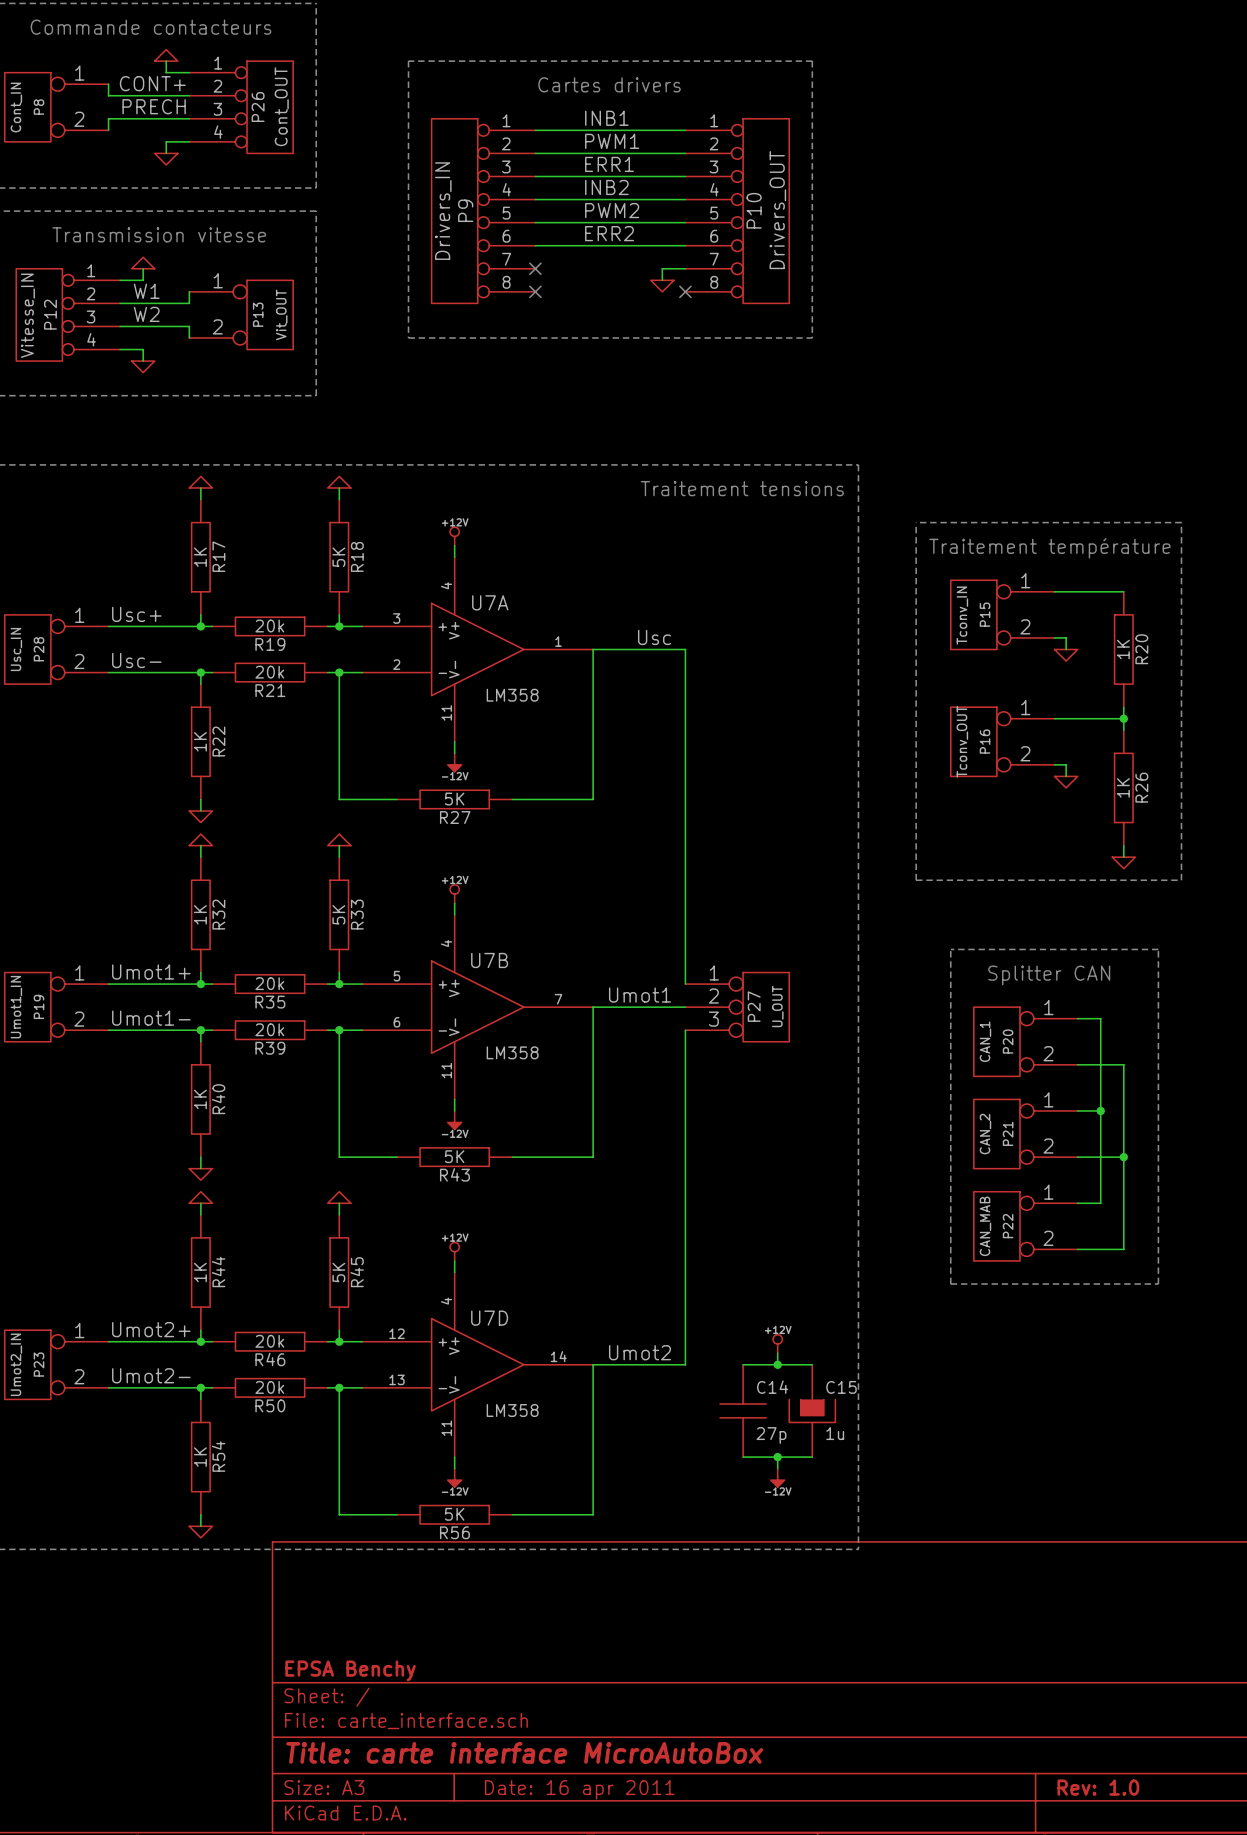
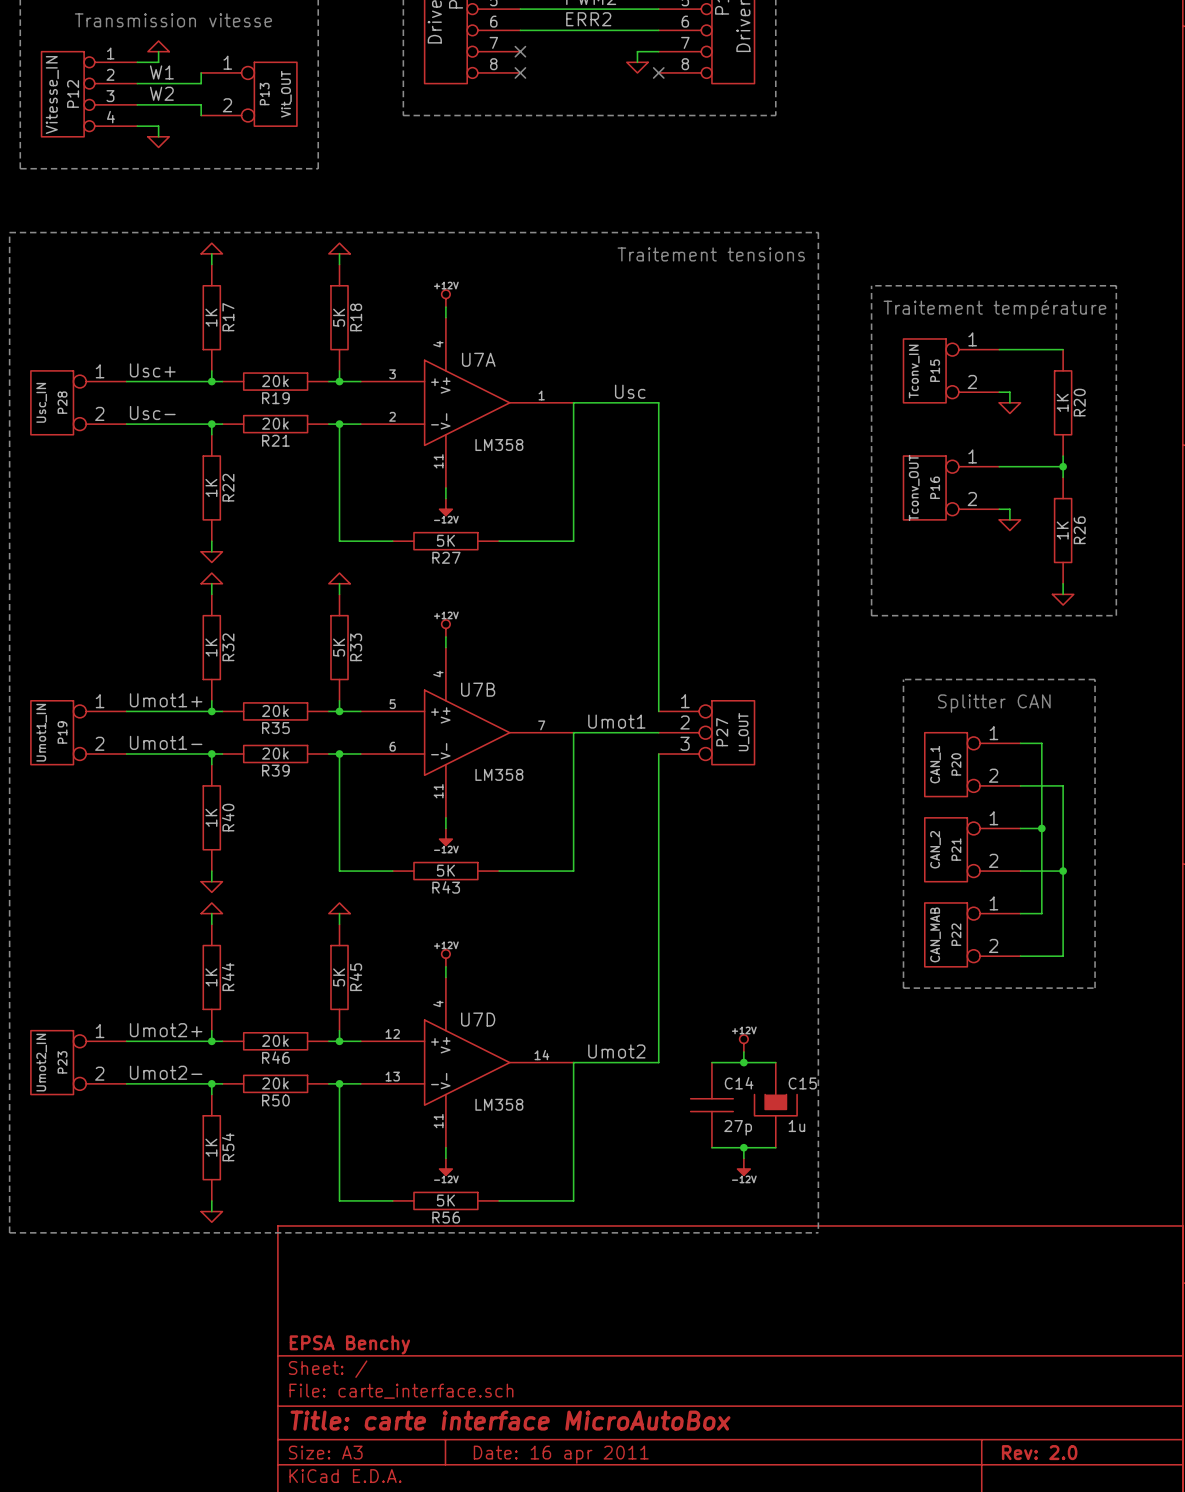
title block: Rev: 1.0 (1098, 1787) -> Rev: 2.0 (1039, 1452)

